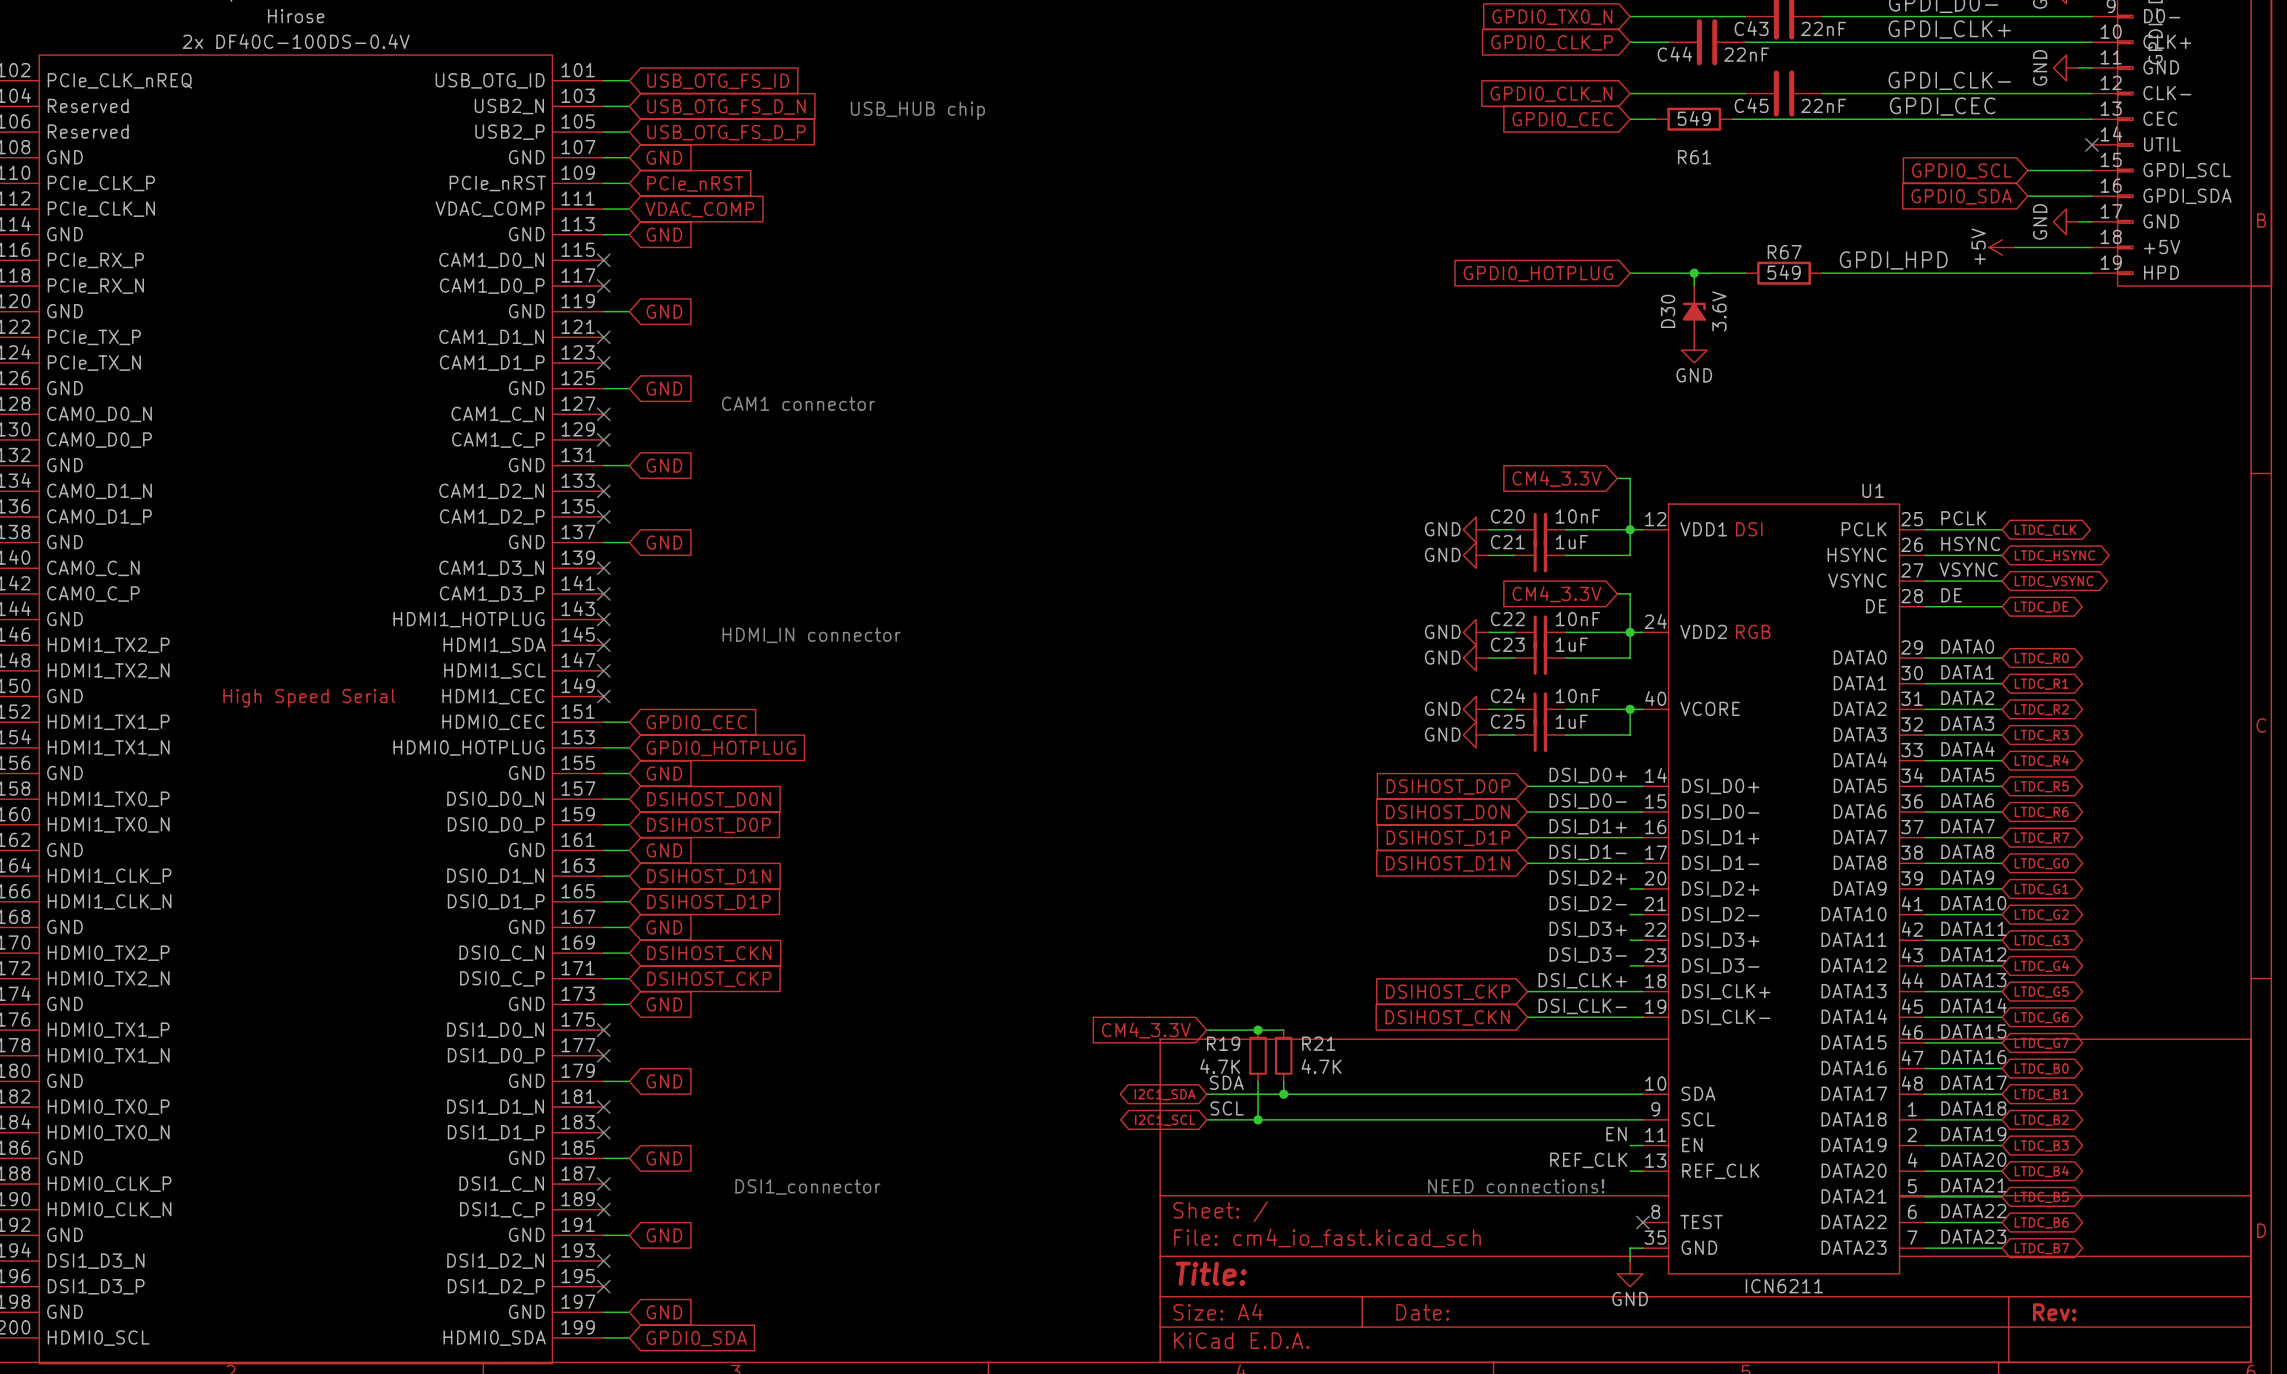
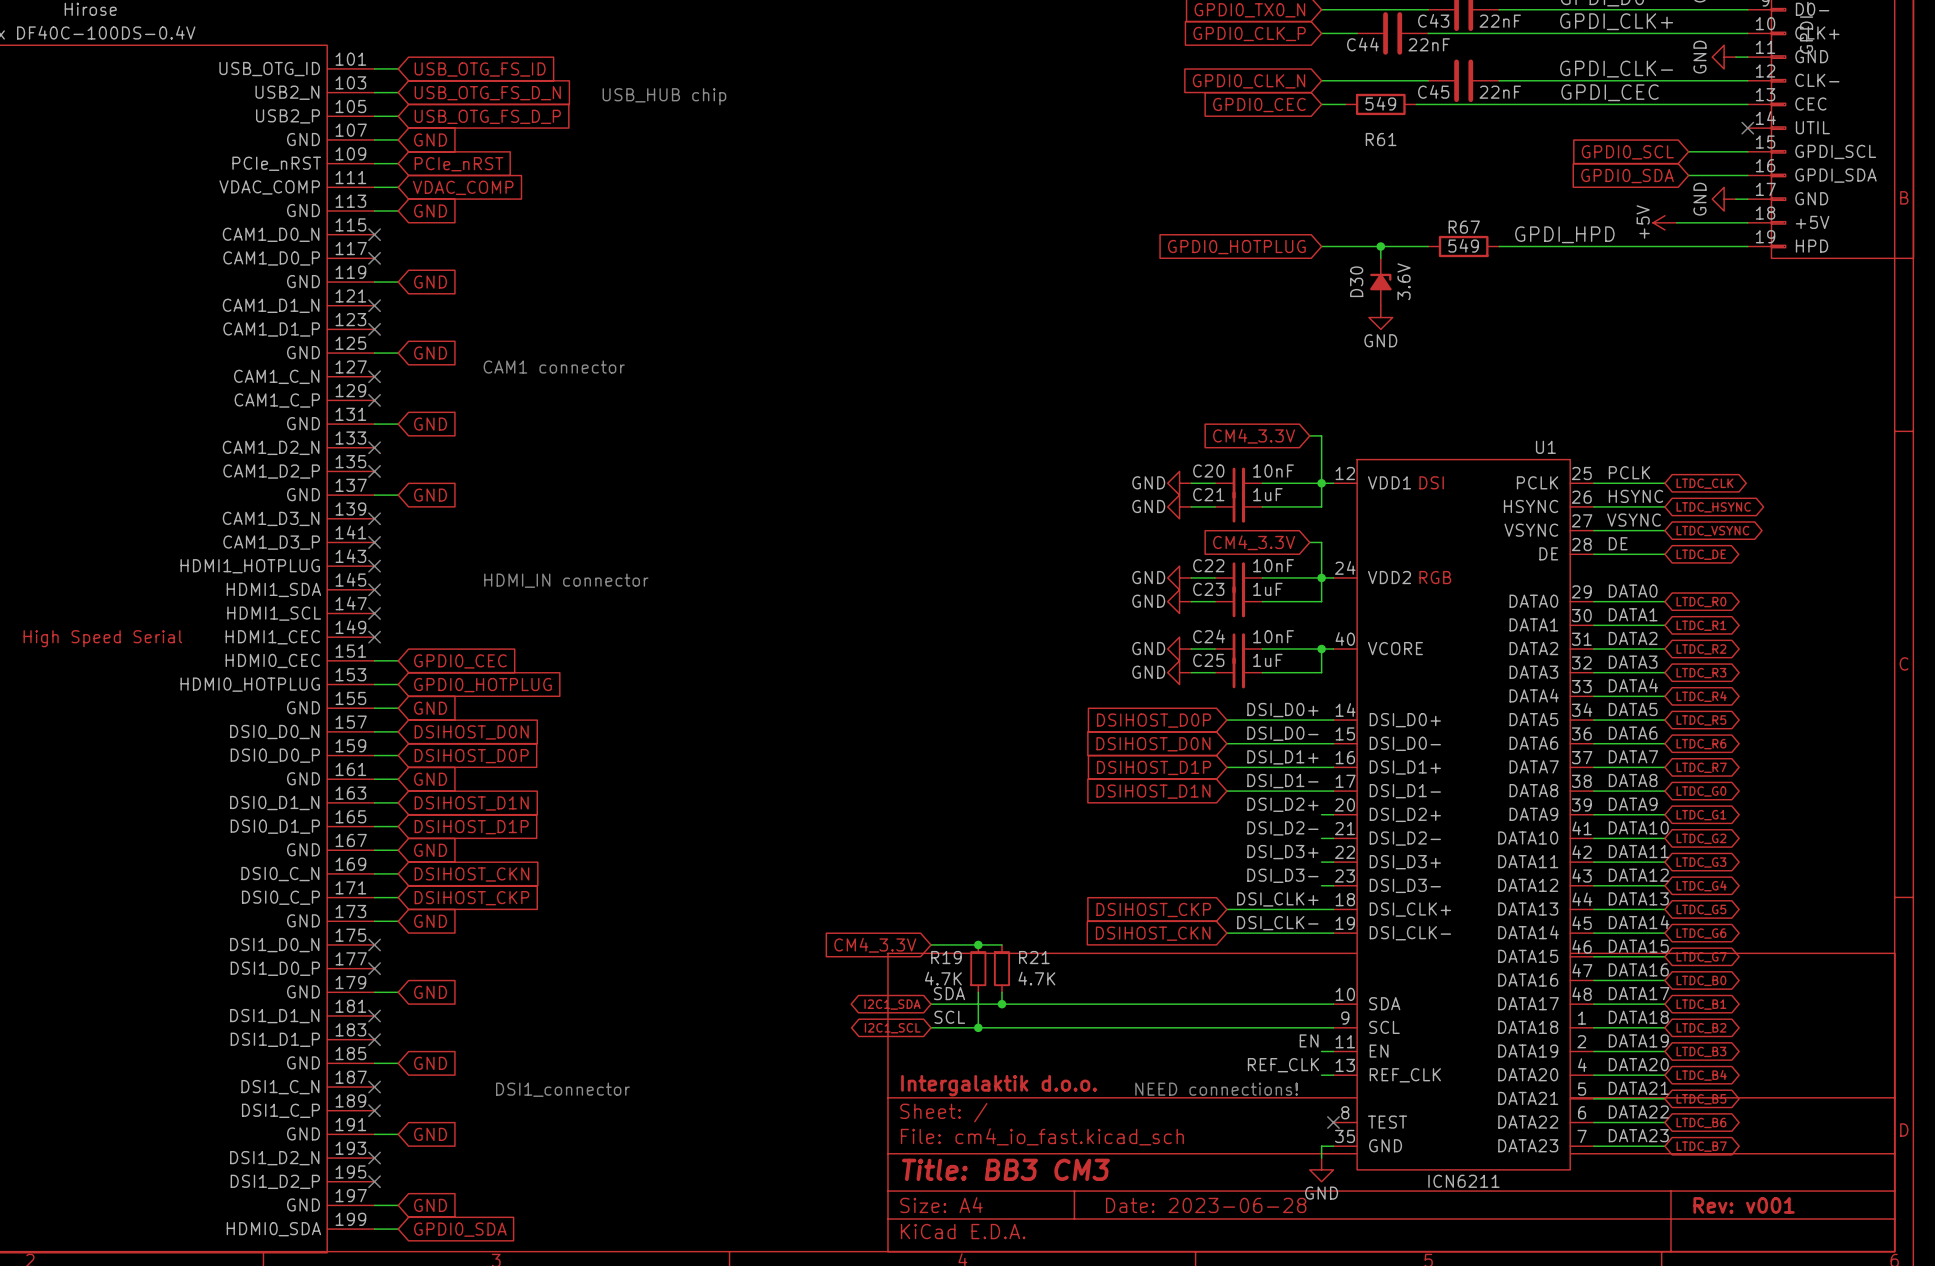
title block: none -> Intergalaktik d.o.o. (999, 1085)
title block: Title: (1210, 1273) -> Title: BB3 CM3 (1005, 1169)
title block: Date: (1422, 1312) -> Date: 2023-06-28 (1206, 1205)
title block: Rev: (2054, 1312) -> Rev: v001 (1744, 1205)

